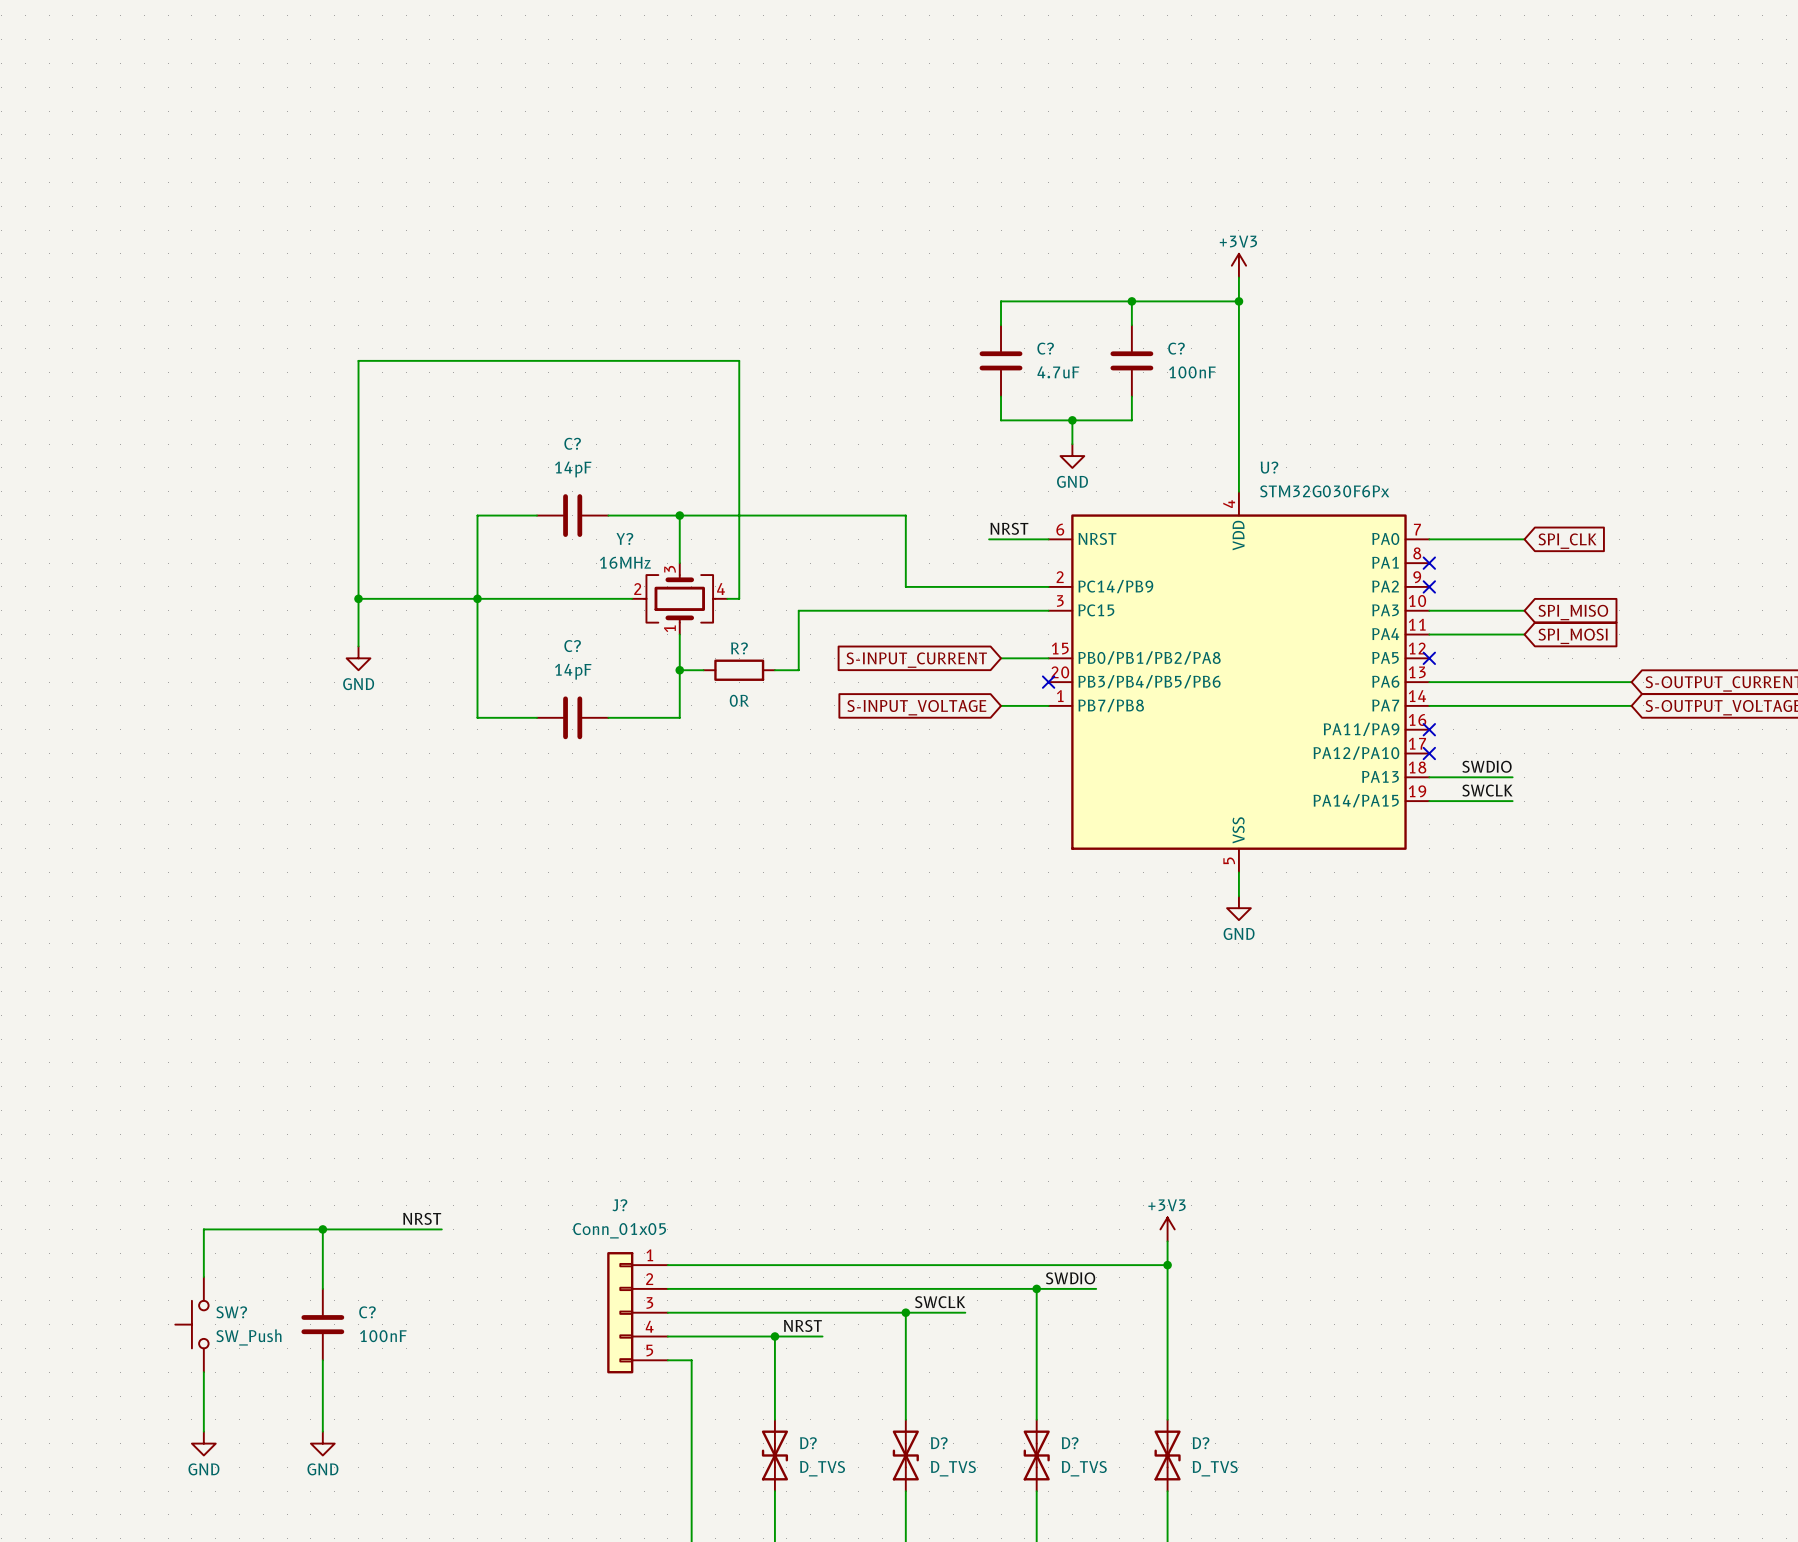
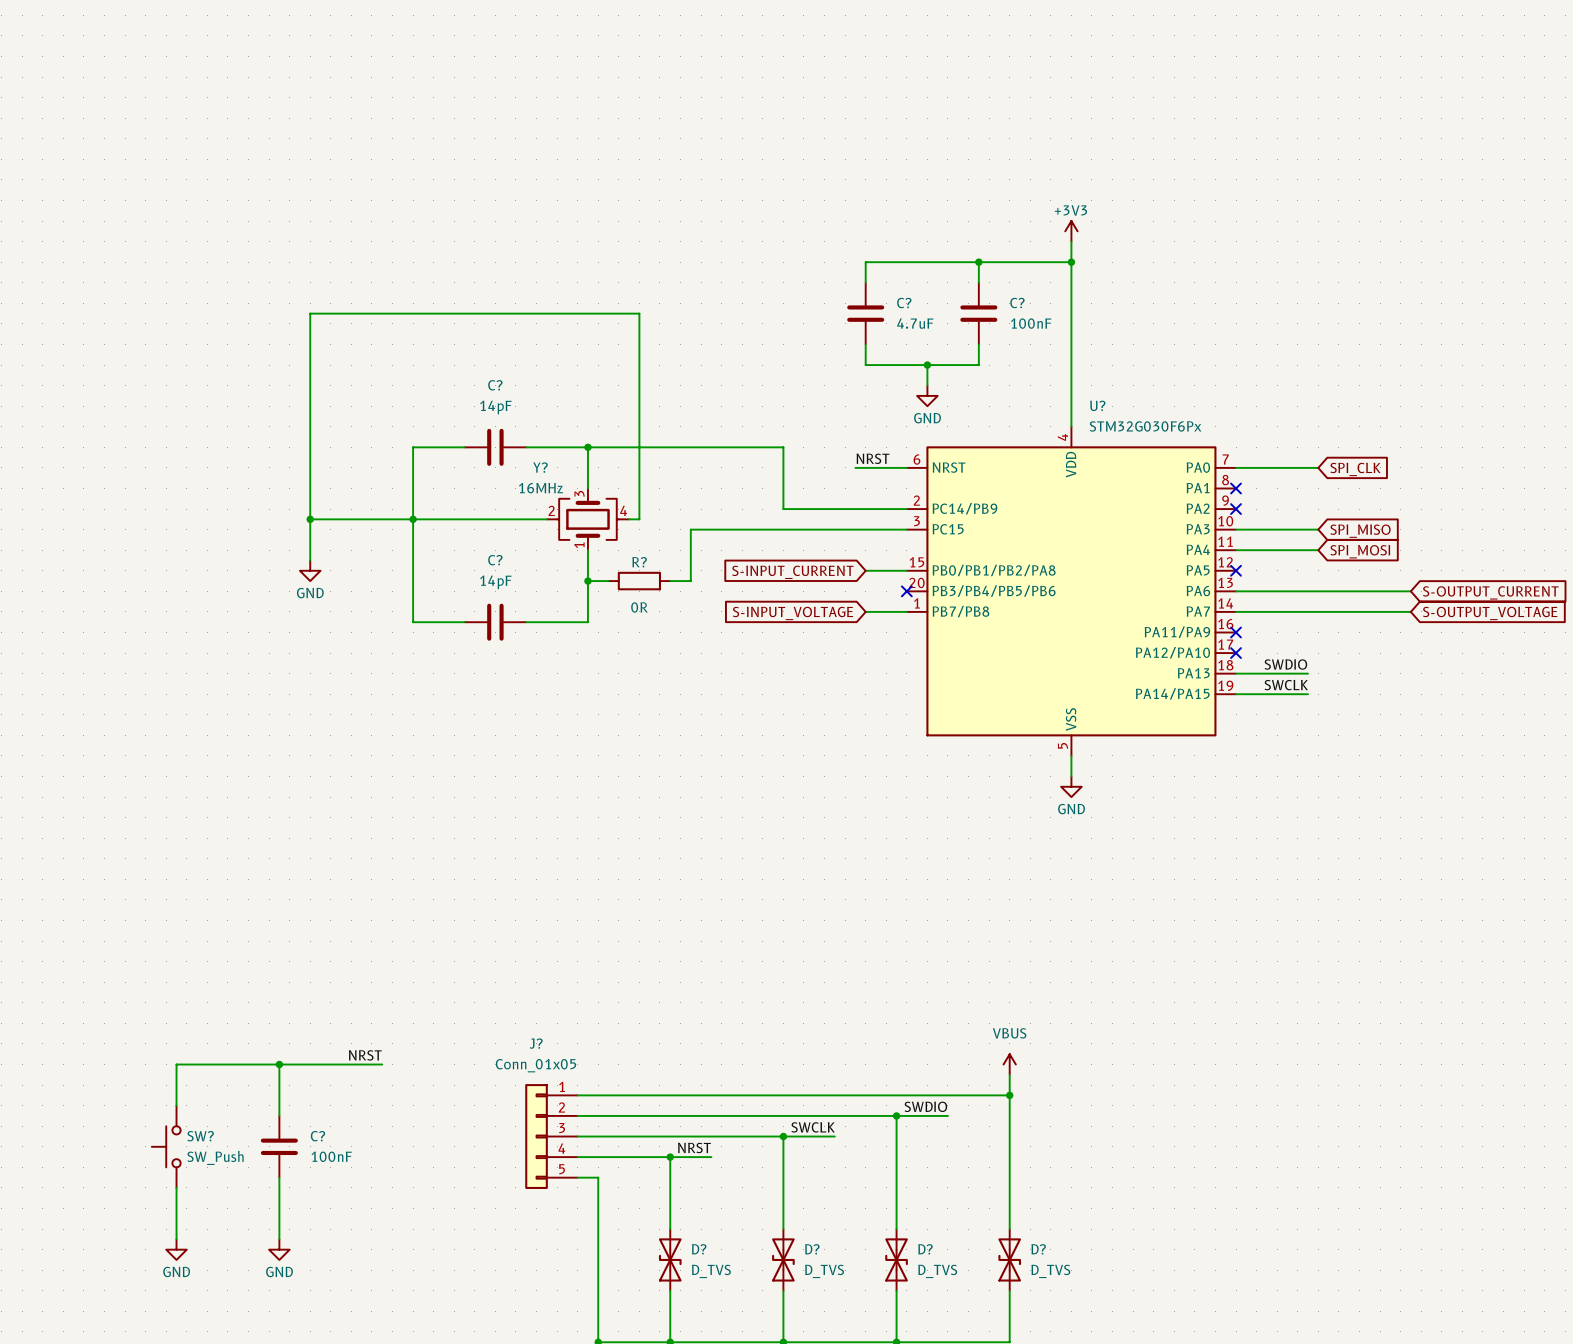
power symbol: +3V3 (1167, 1229) -> VBUS (1009, 1064)

